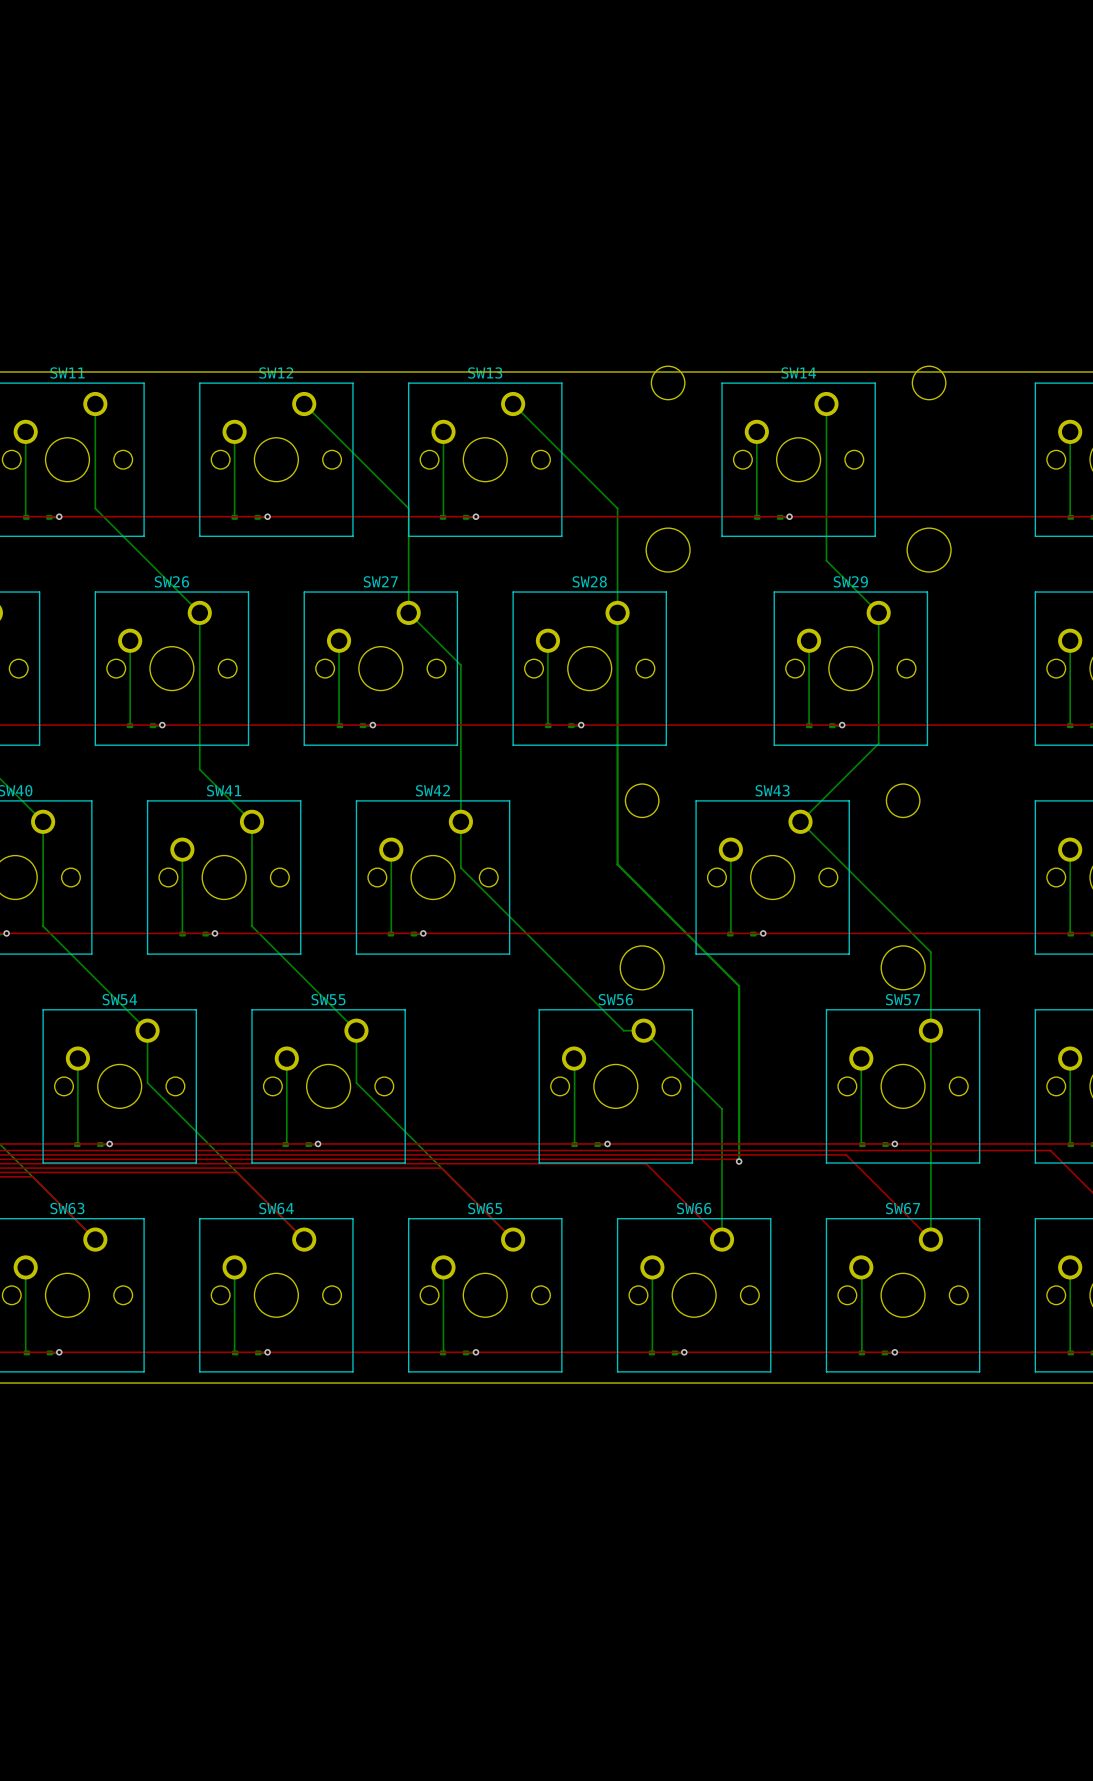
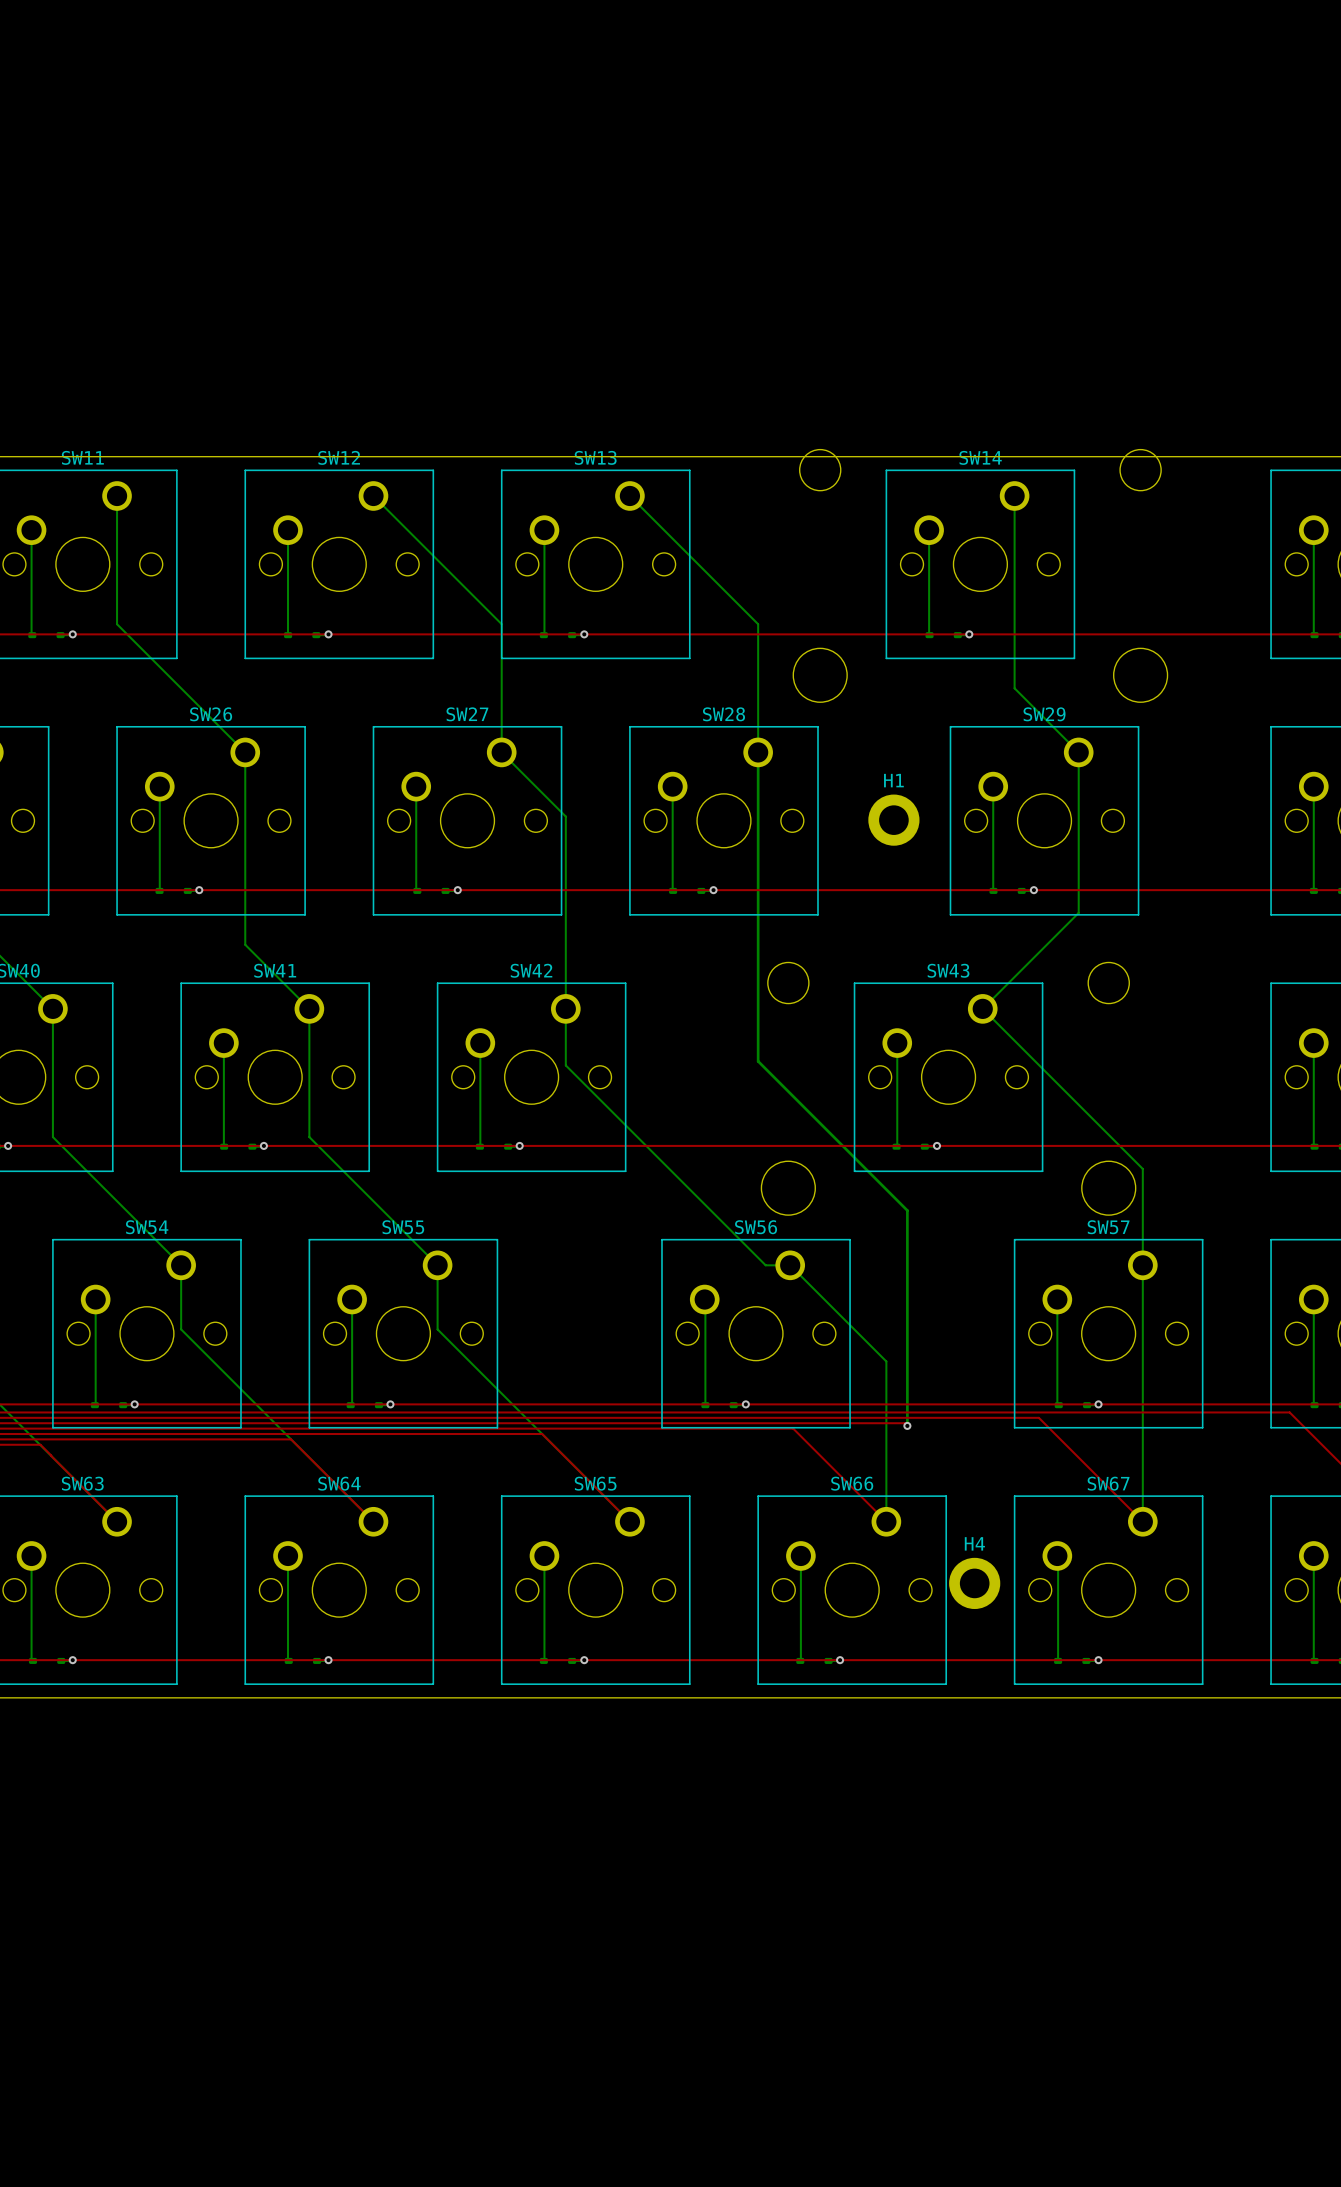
H1: none -> (893, 820)
H4: none -> (974, 1583)

